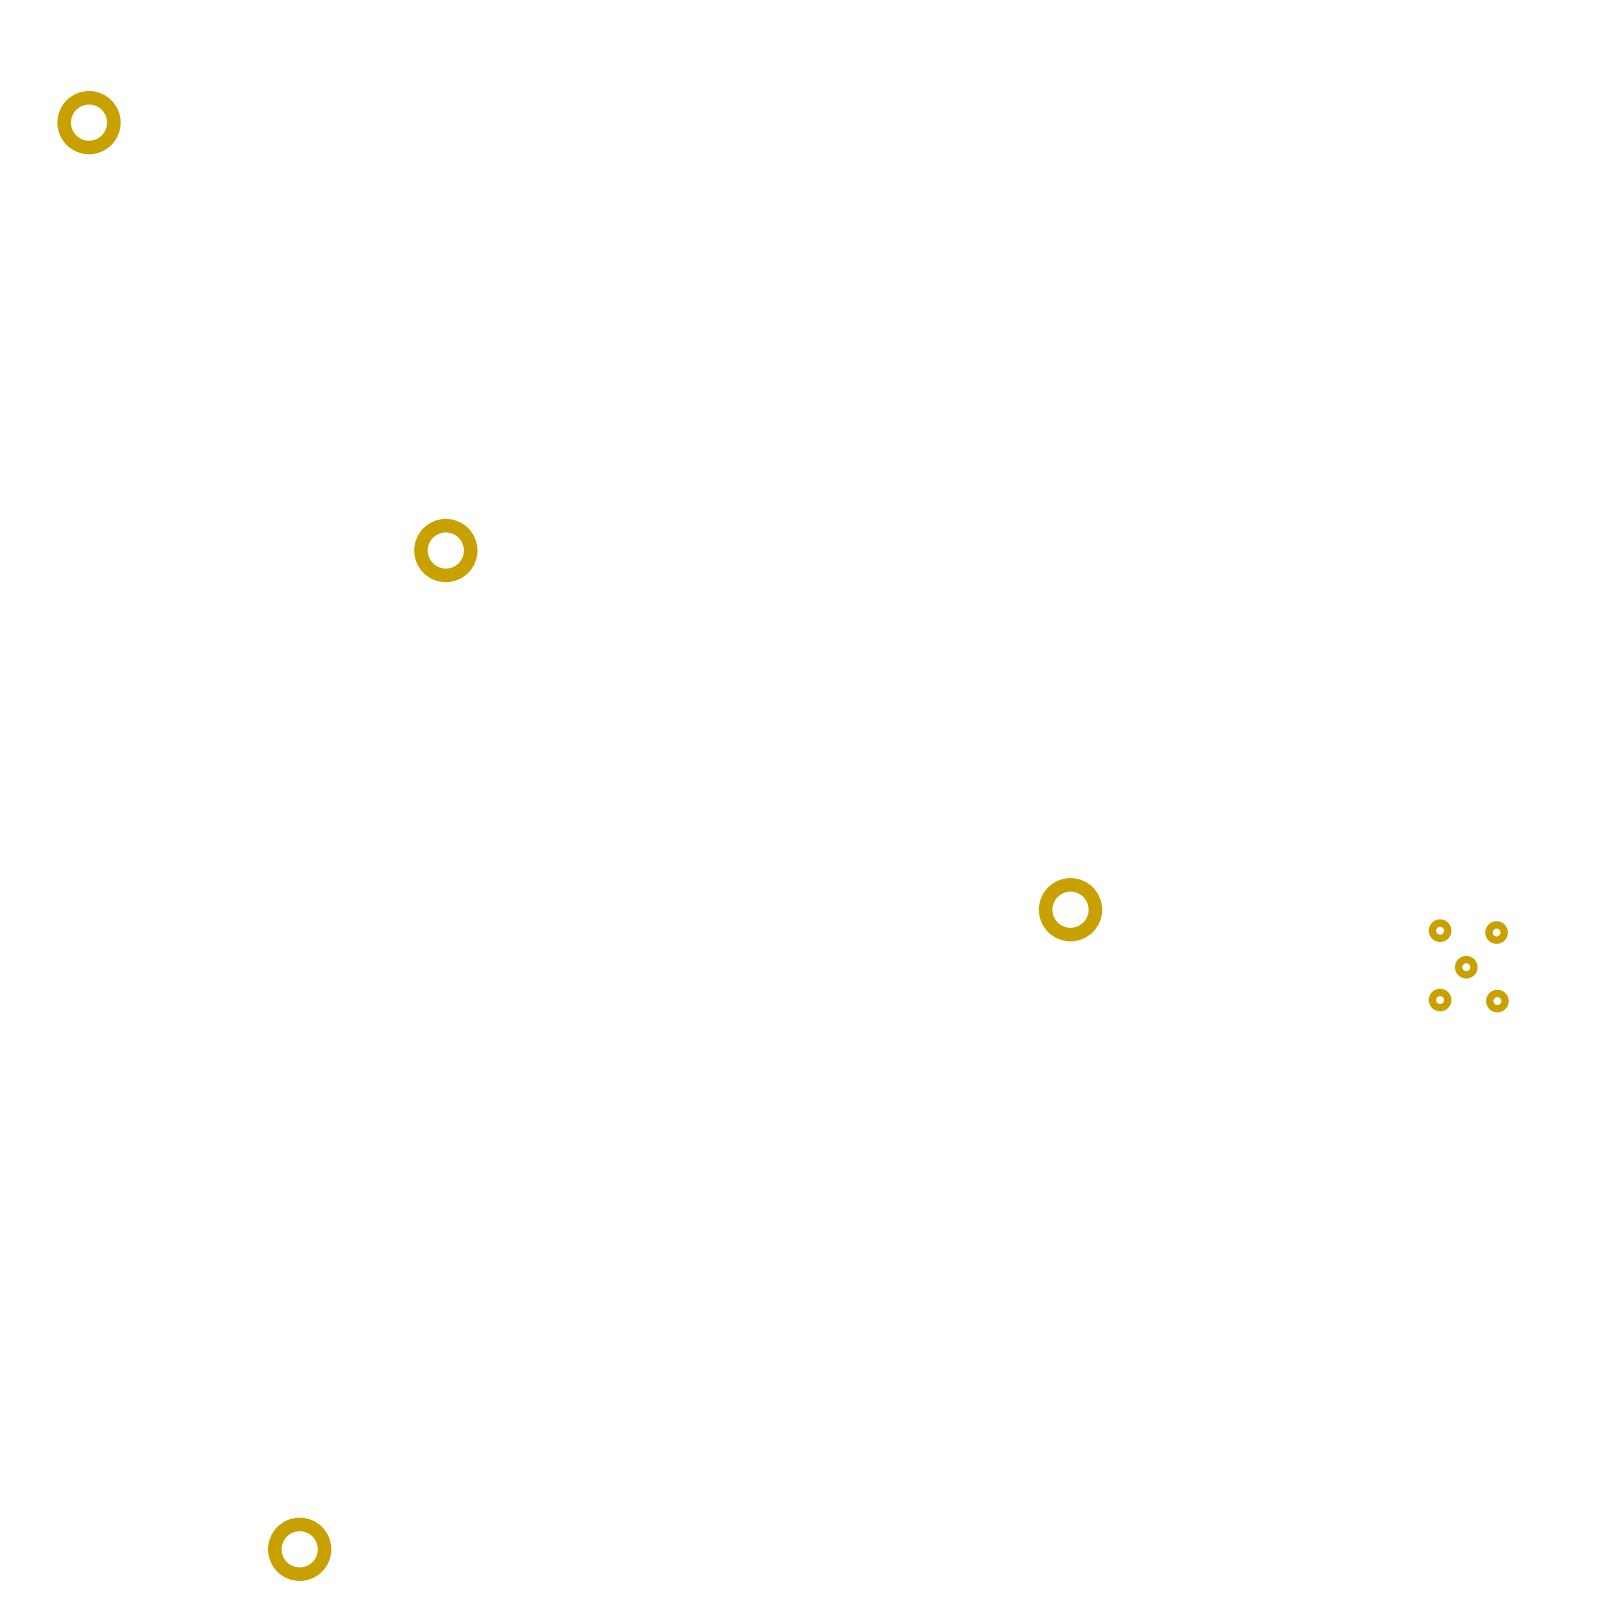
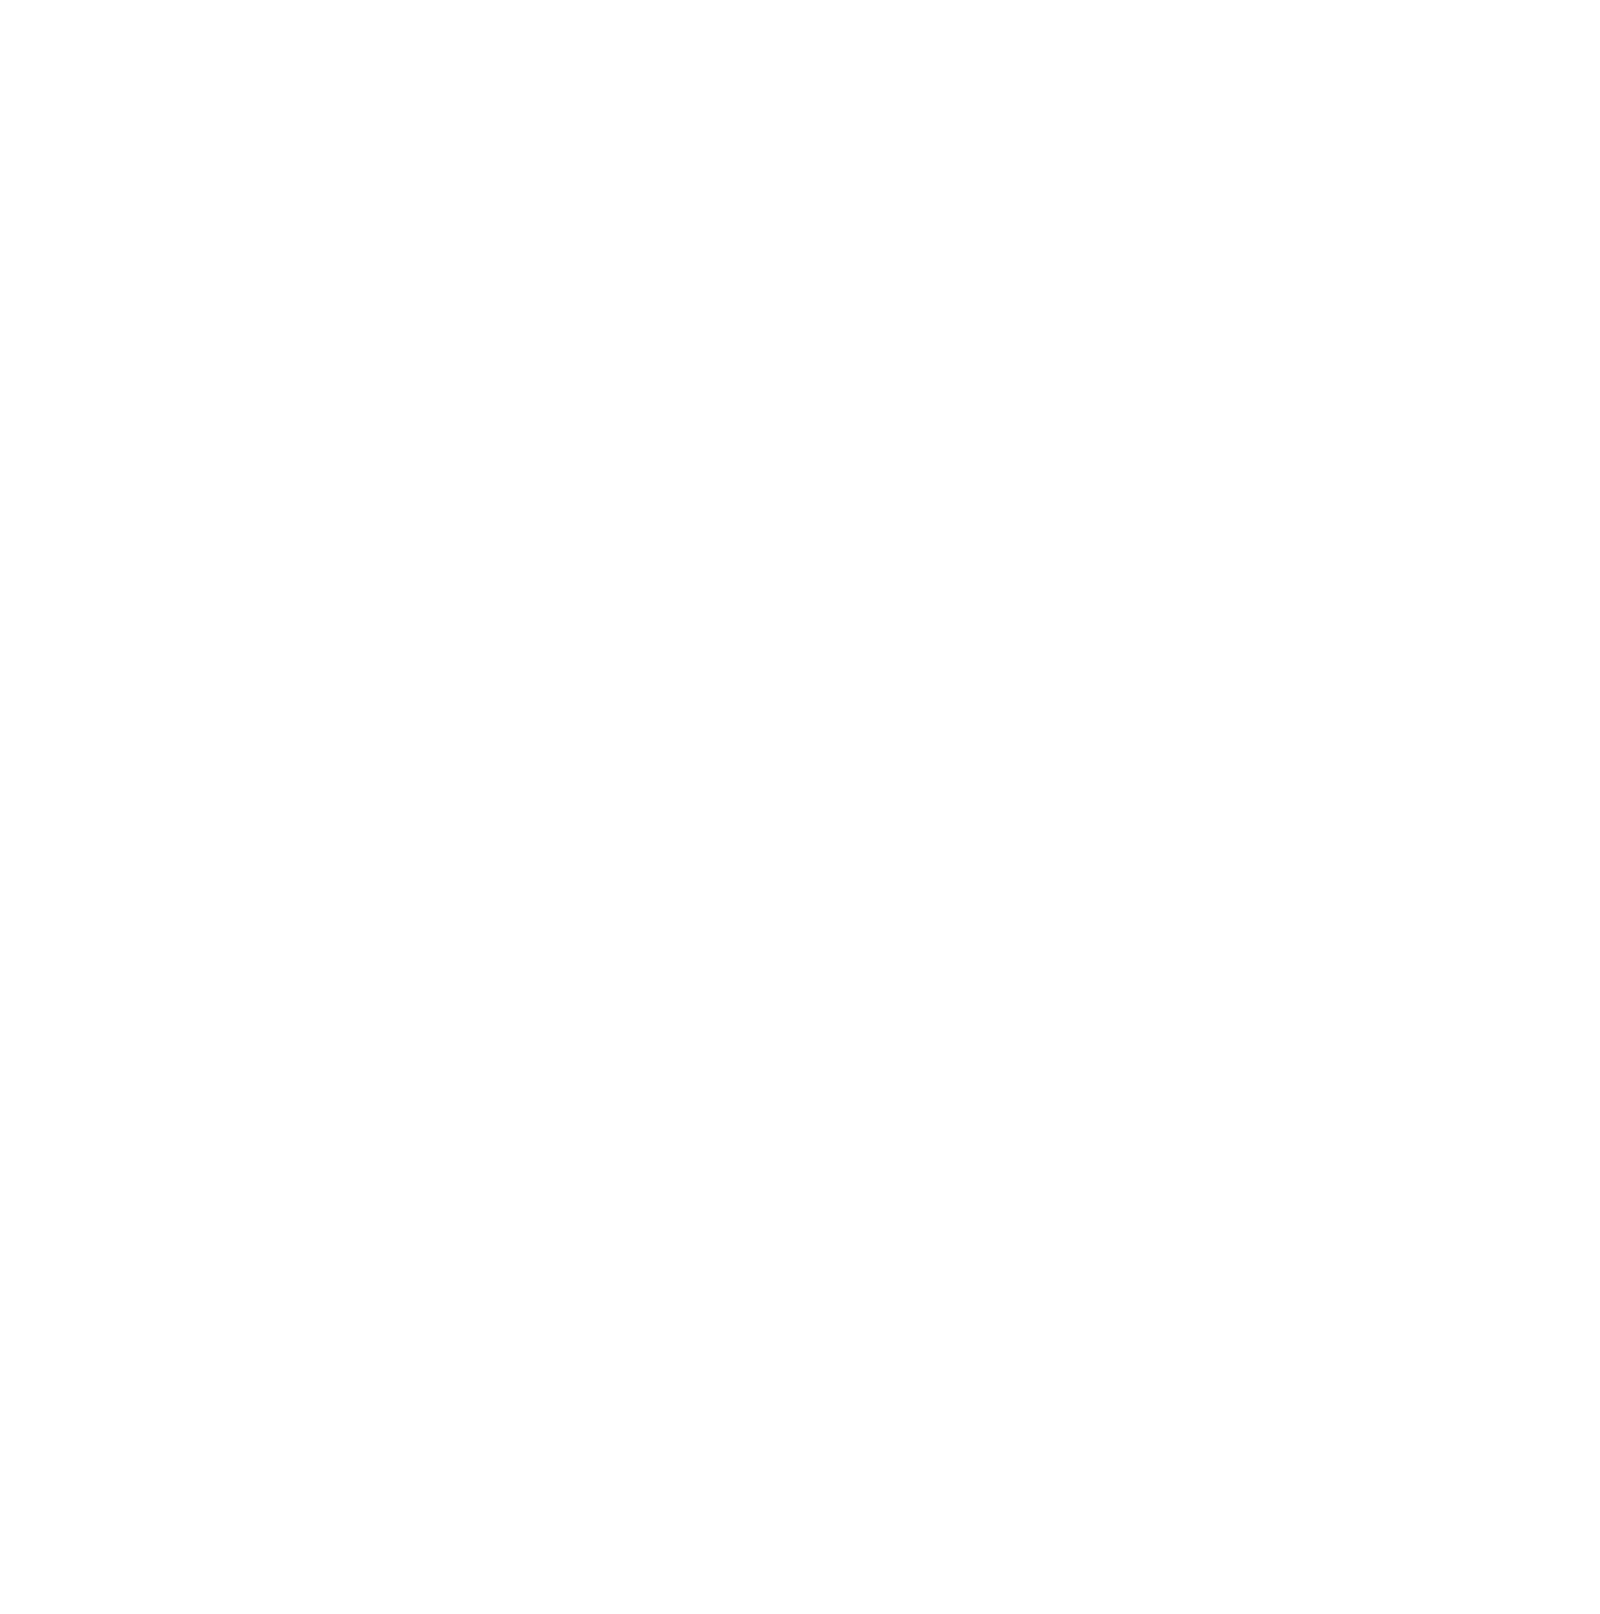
part: (89, 122) -> none
part: (445, 550) -> none
part: (1070, 909) -> none
part: (1468, 965) -> none
part: (299, 1549) -> none

